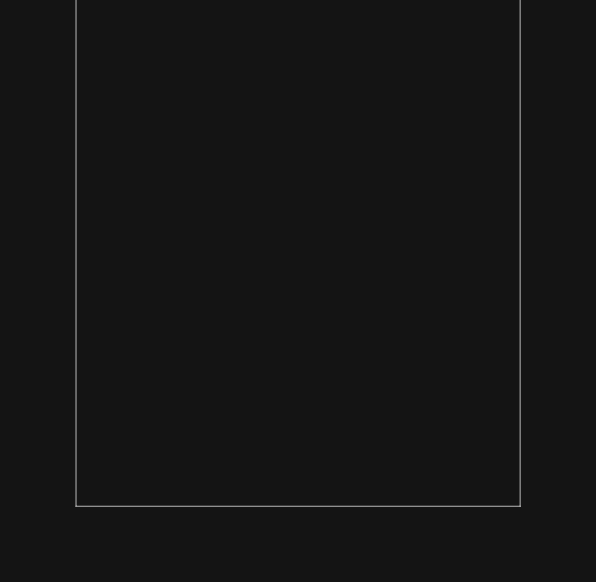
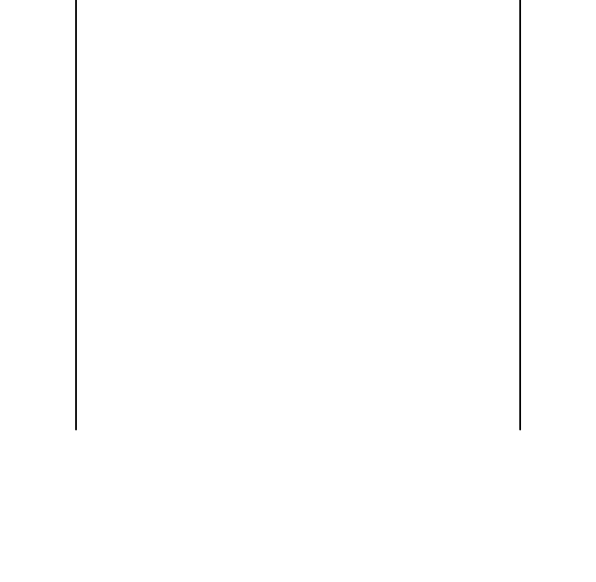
board edge: (520, 429) (520, 506) (76, 506) (76, 429) -> none

